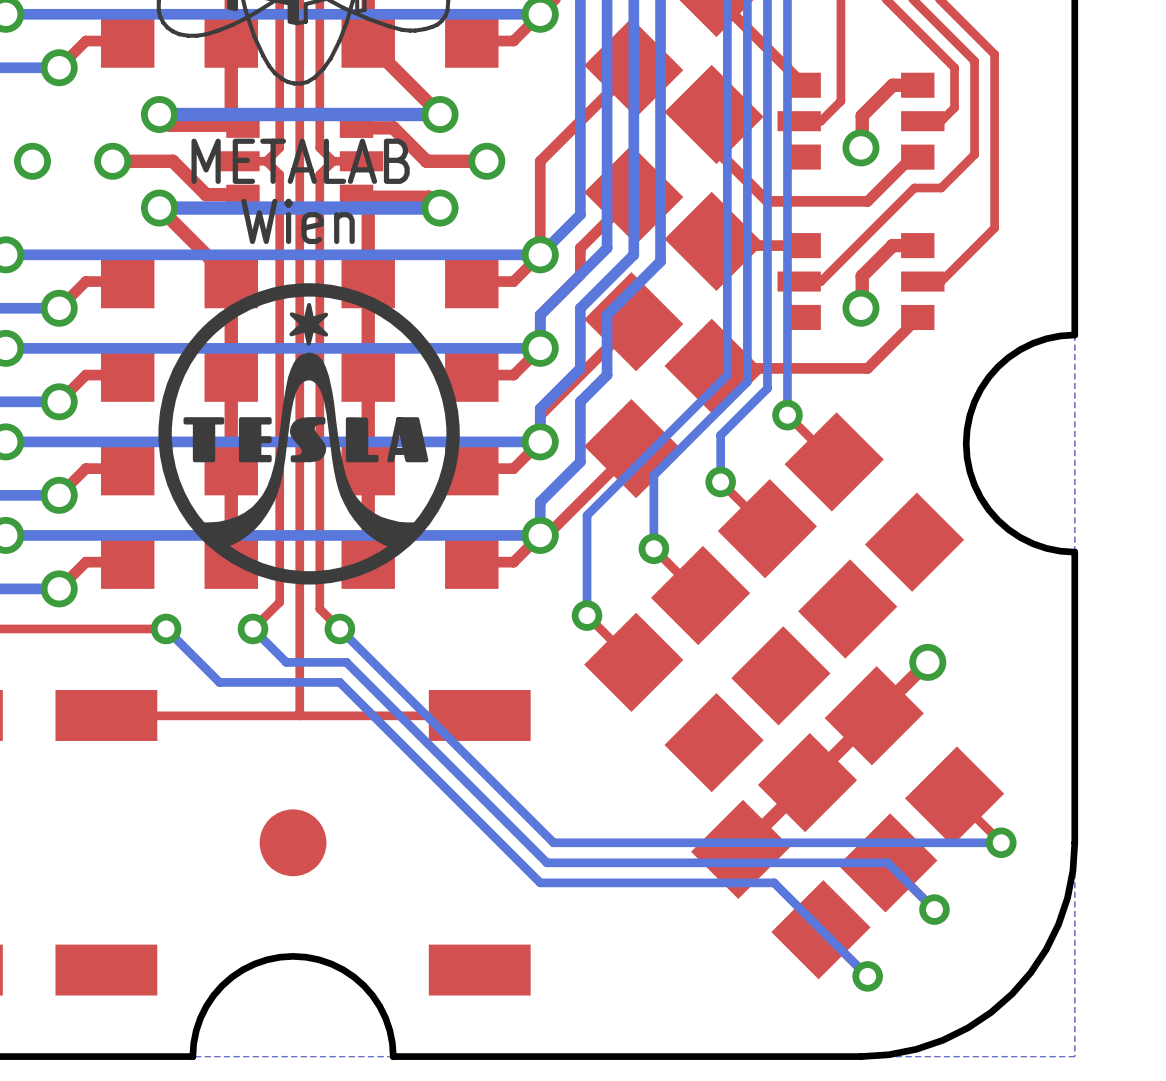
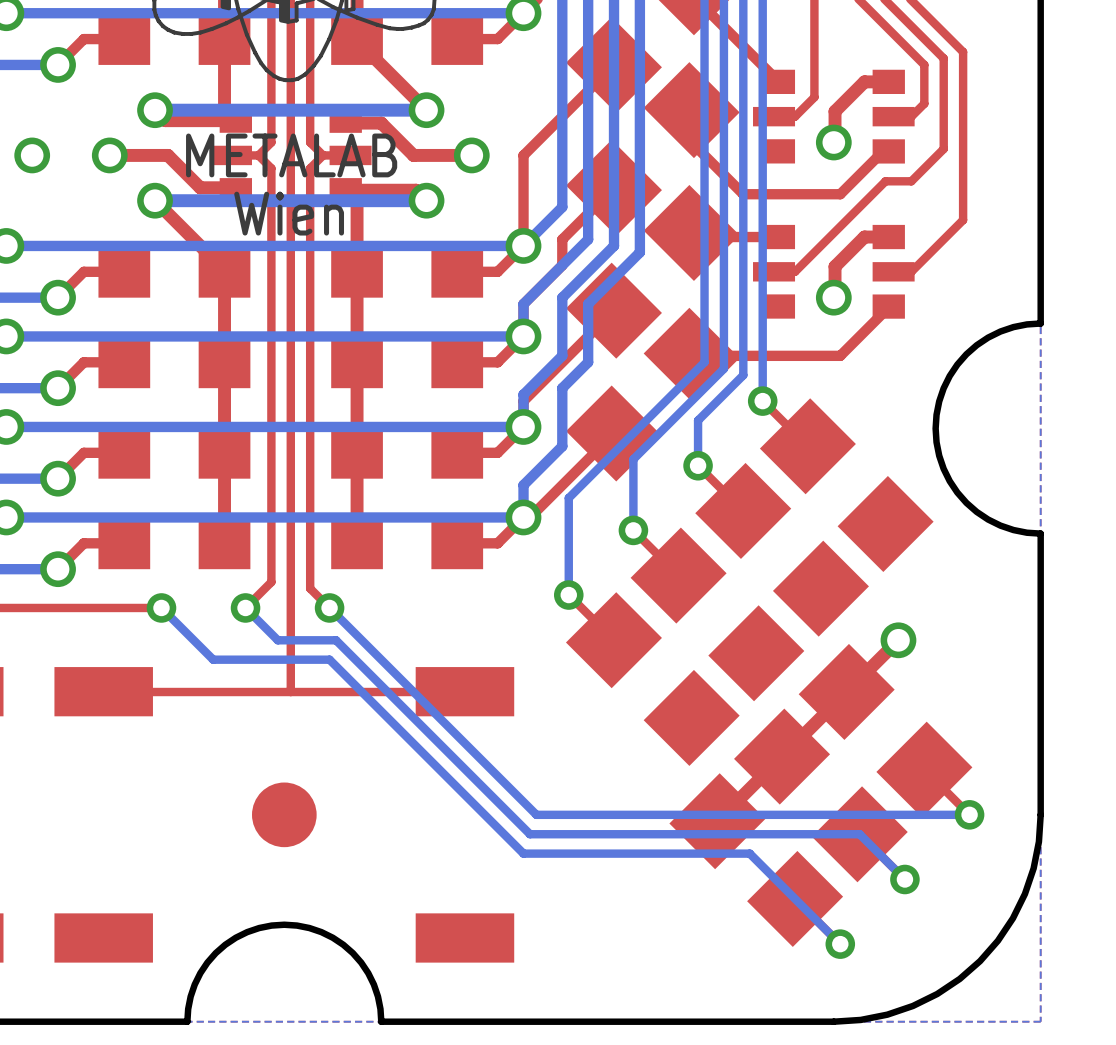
drawing: [158, 283, 460, 585] -> none

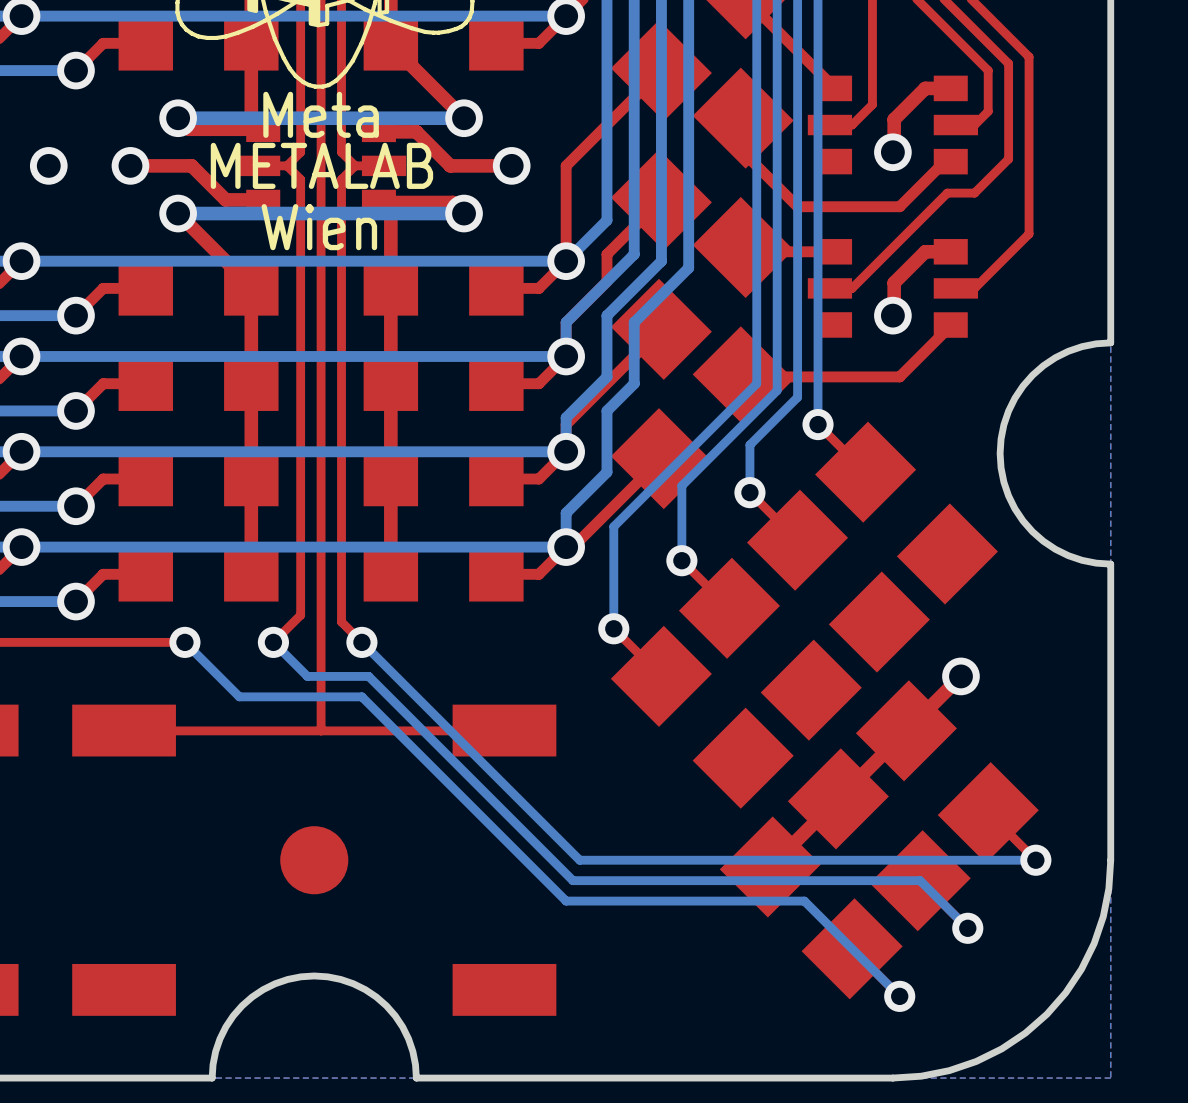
text: none -> Meta (321, 114)

